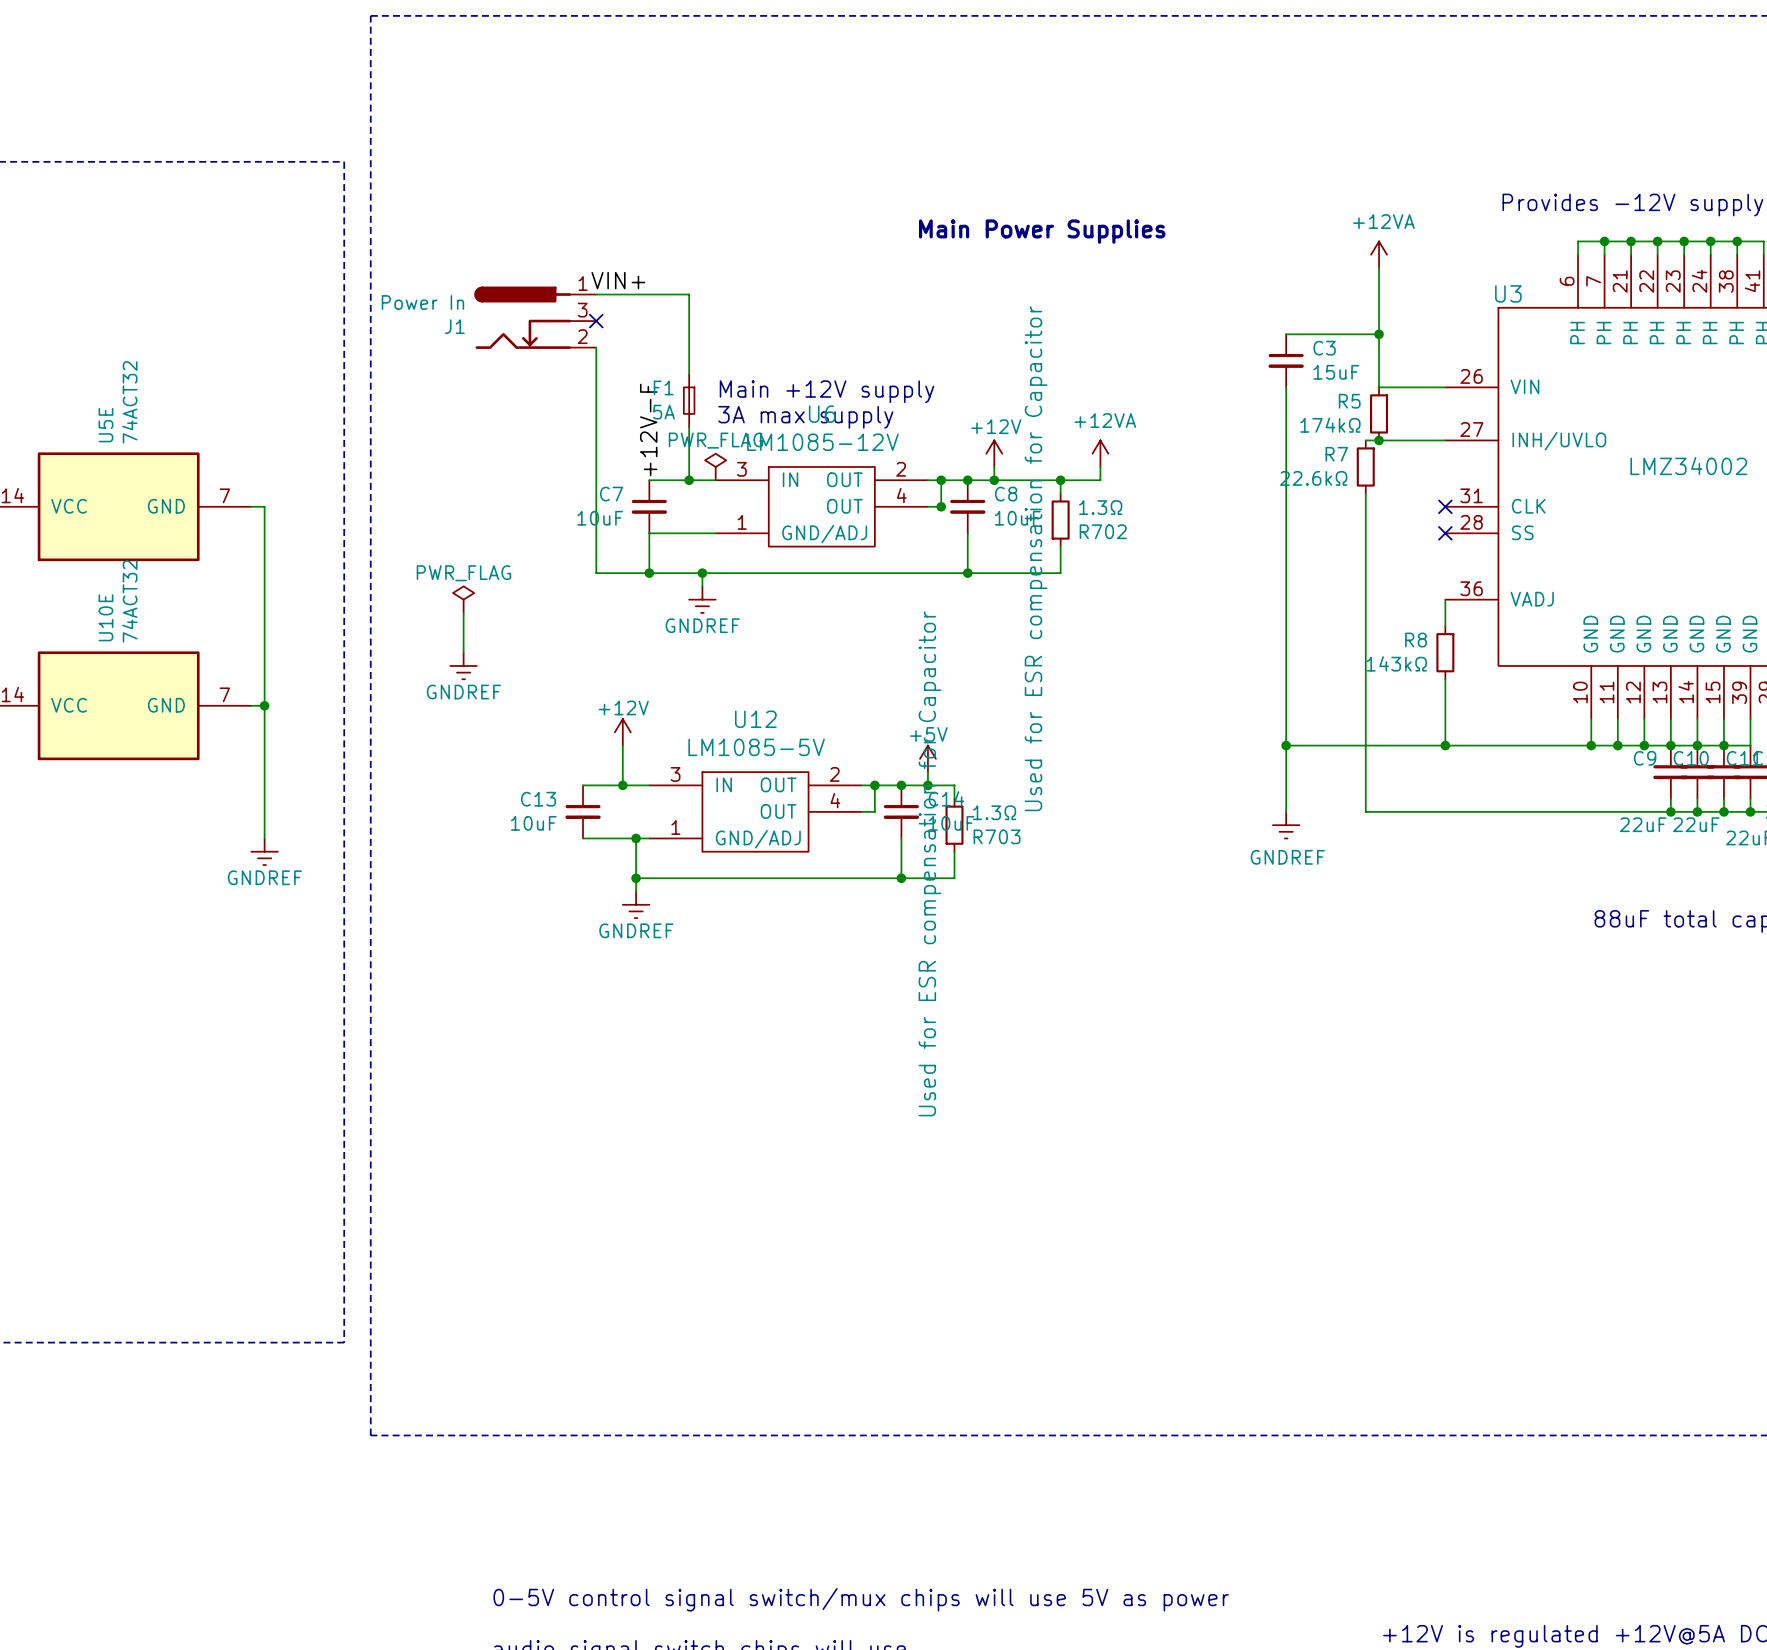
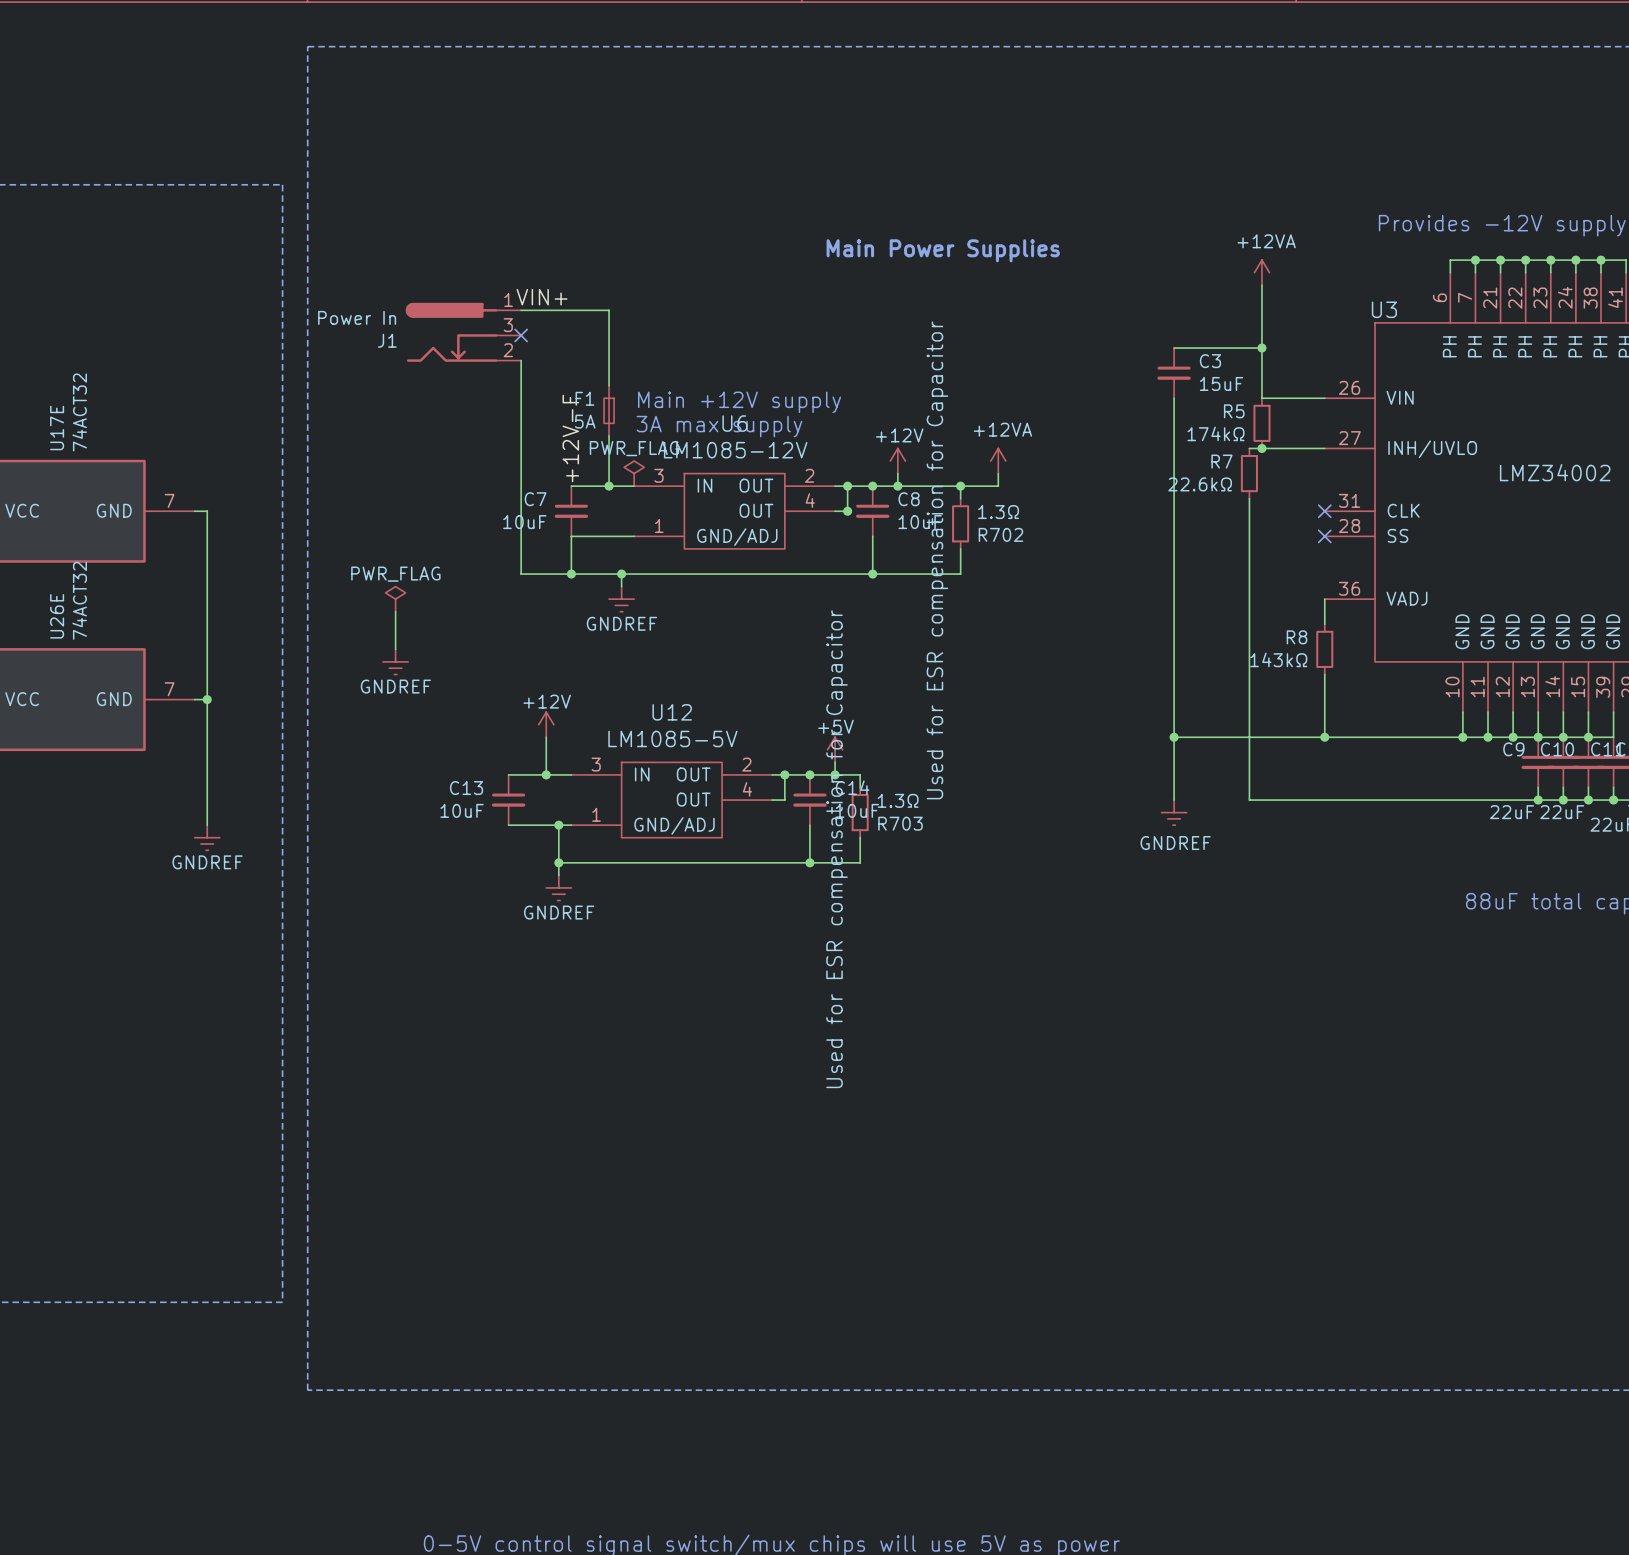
U5E name: U5E (105, 425) -> U17E (57, 427)
U10E name: U10E (105, 617) -> U26E (57, 616)

